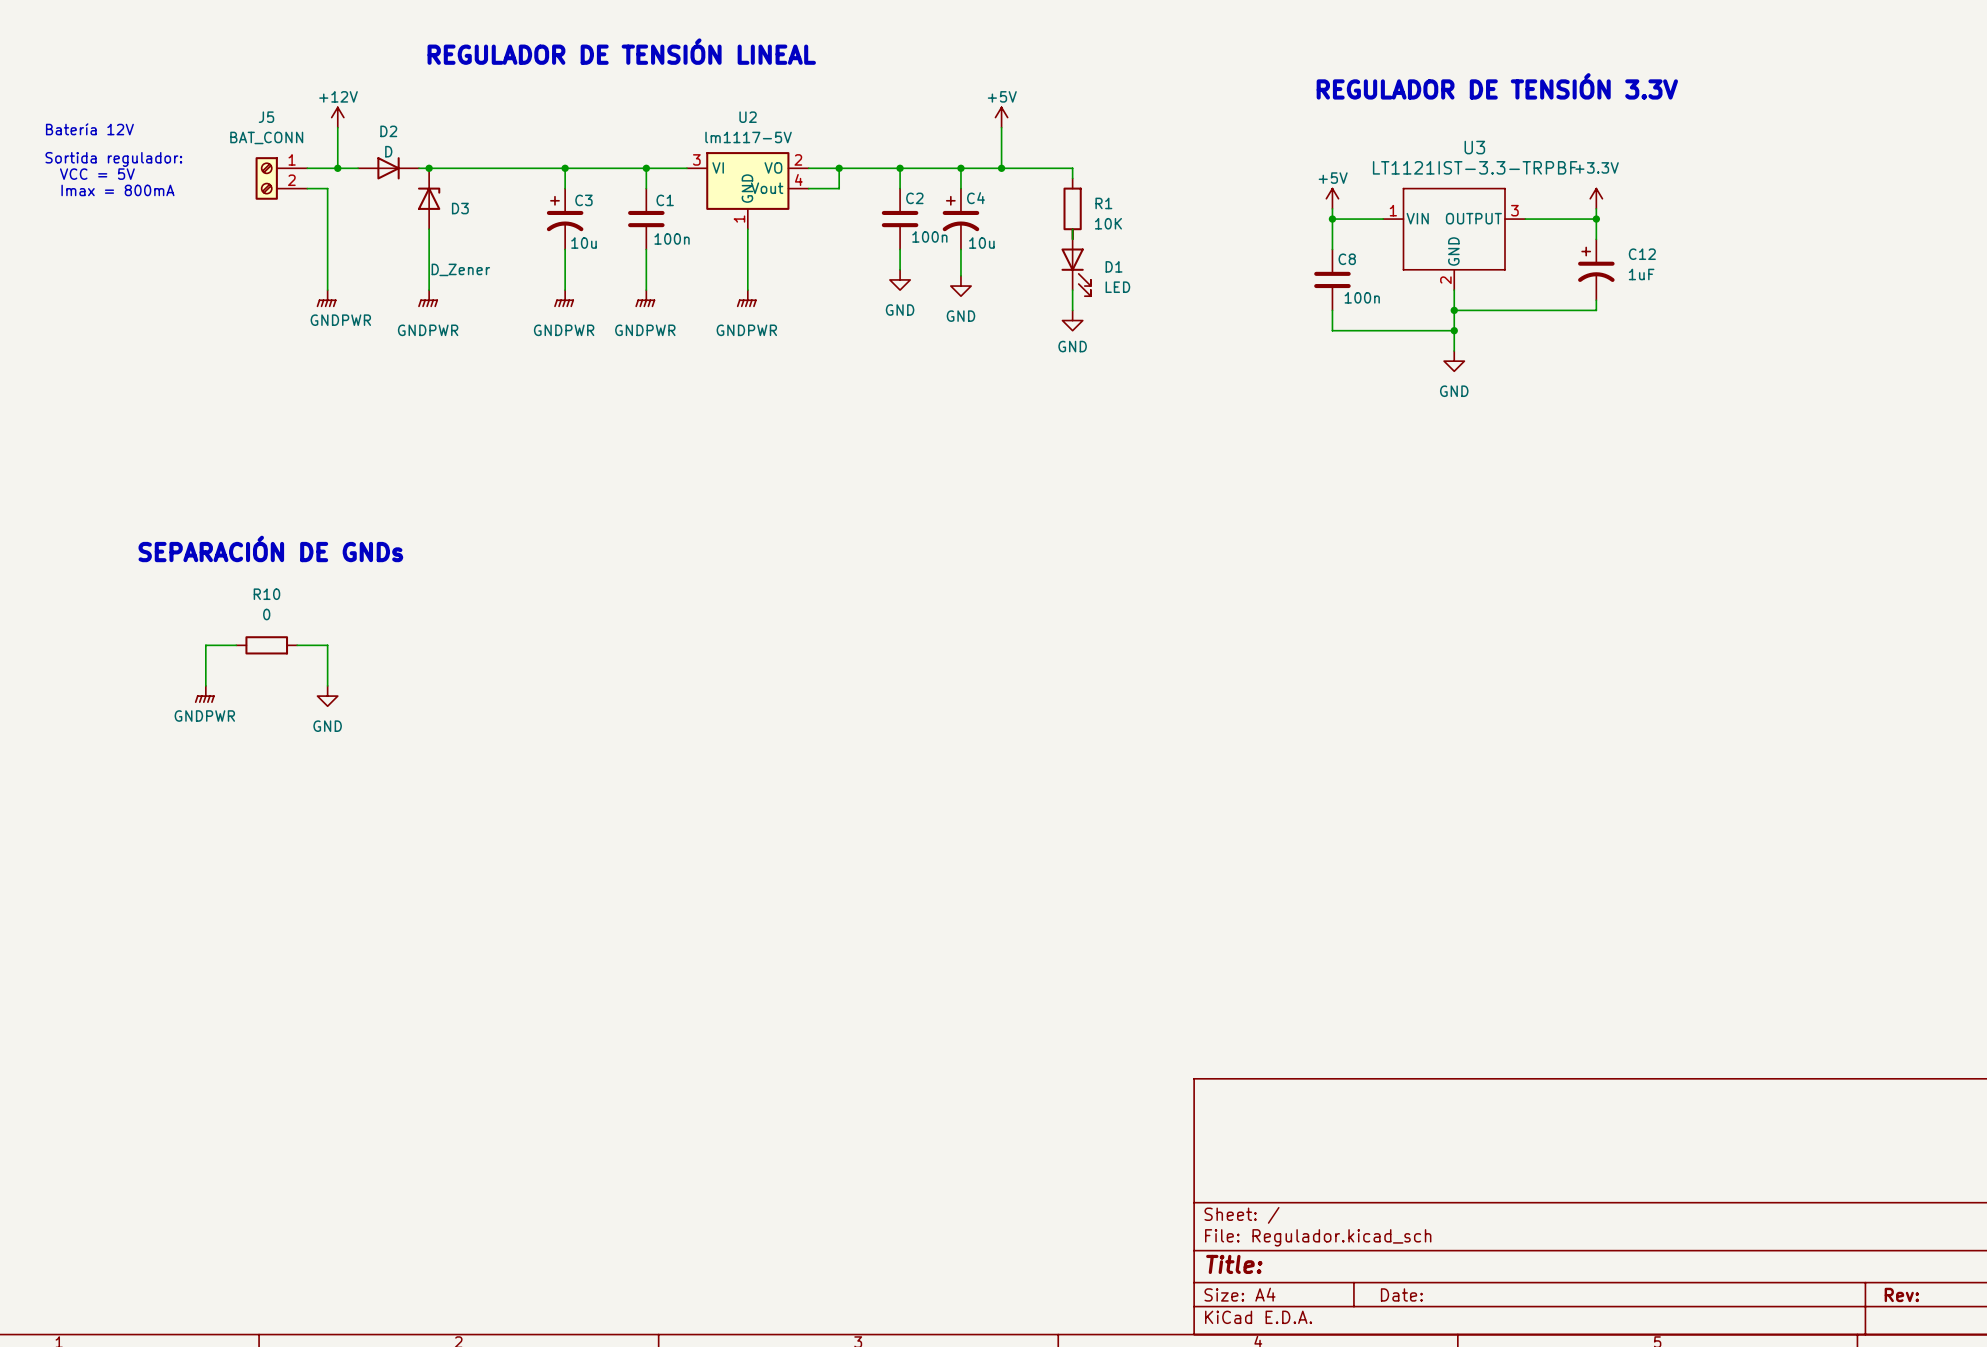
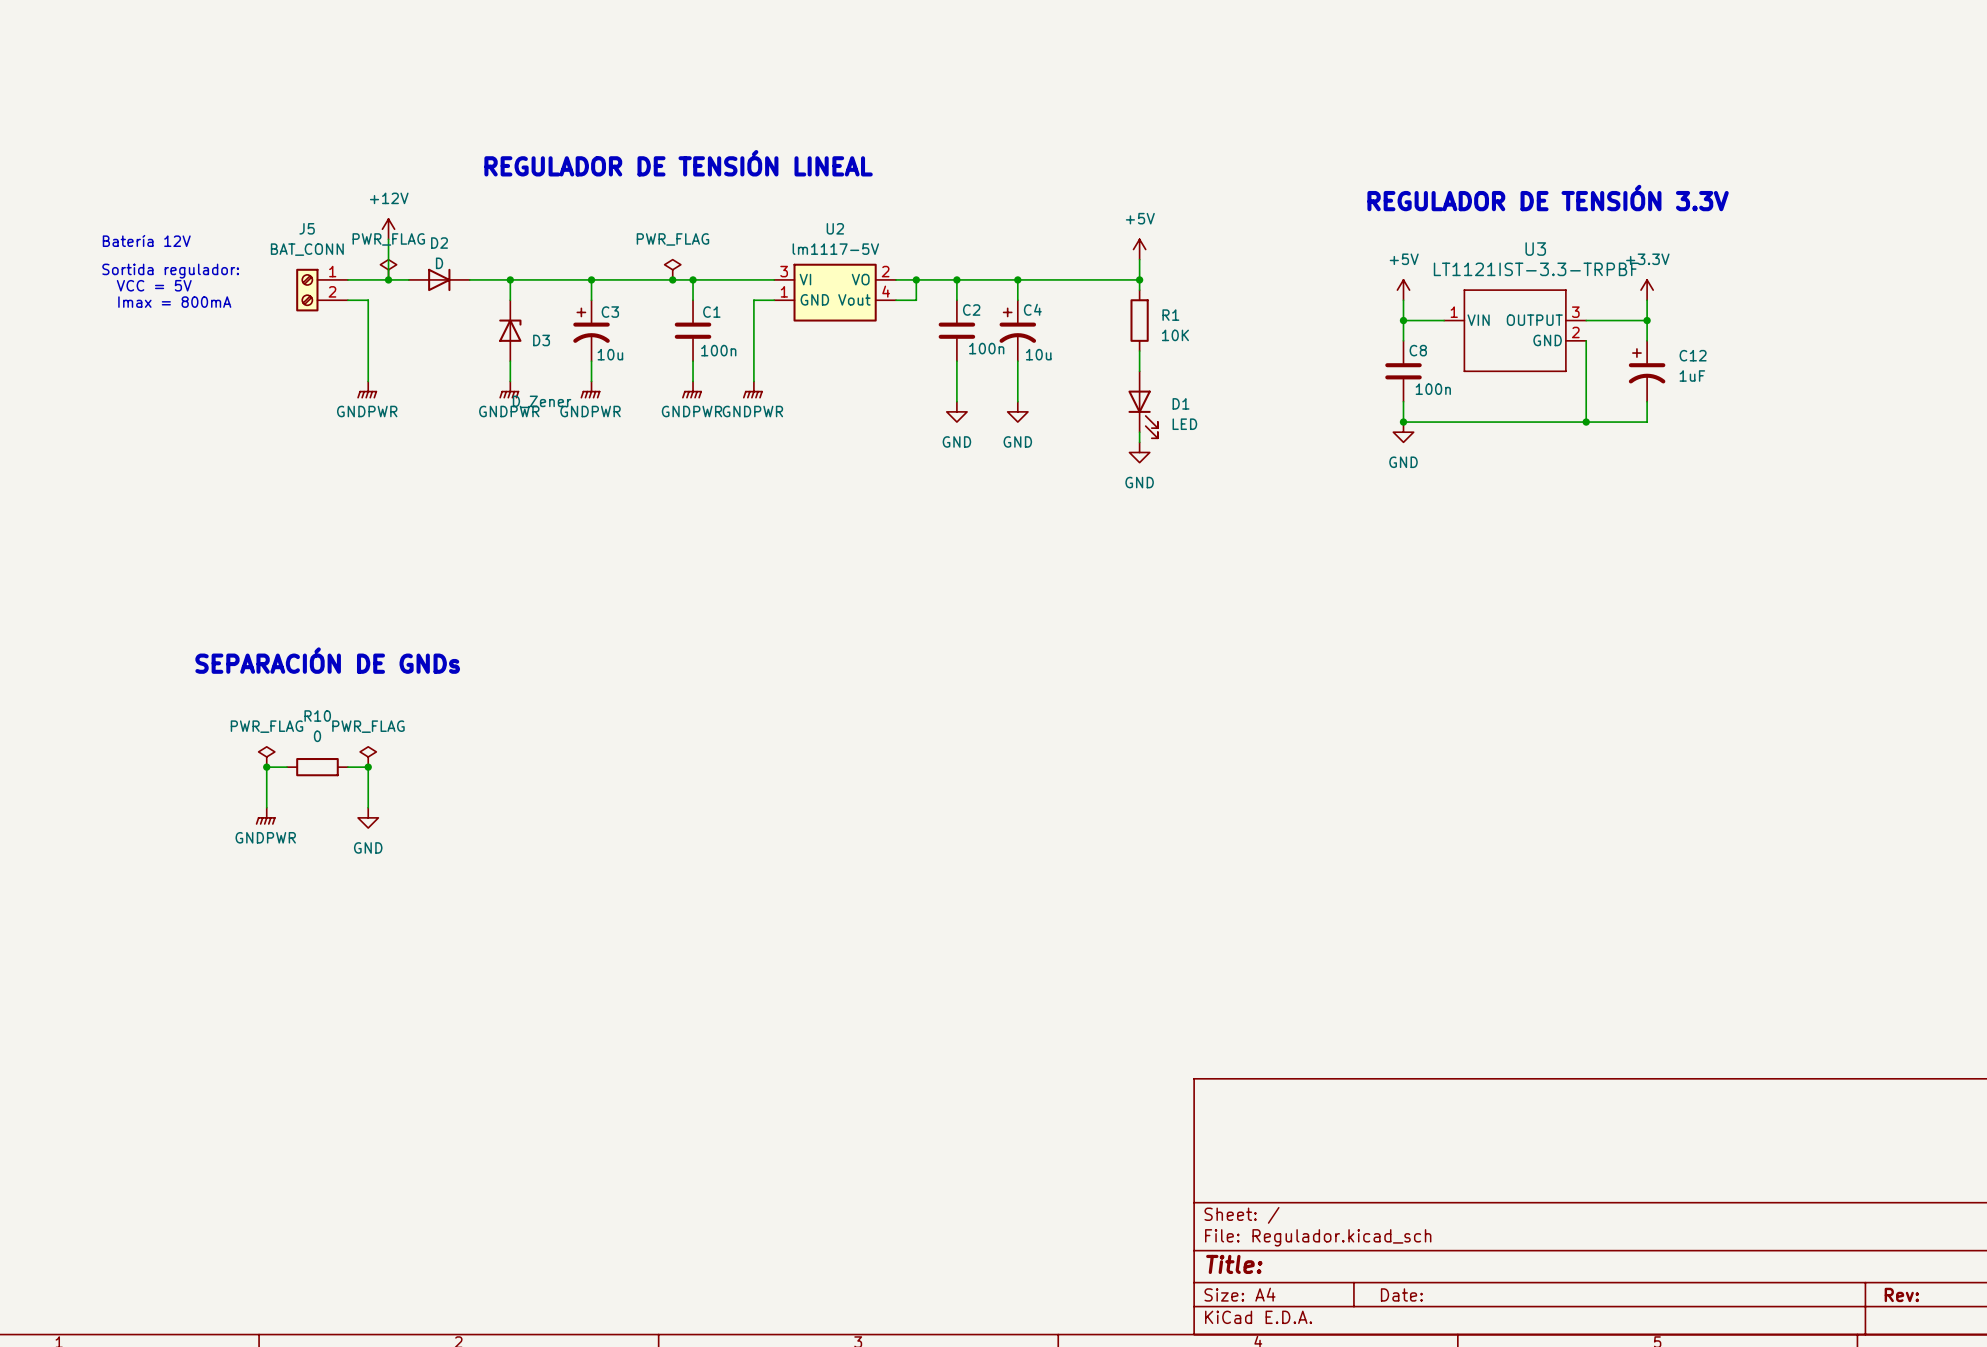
text position: REGULADOR DE TENSIÓN LINEAL (621, 51) -> REGULADOR DE TENSIÓN LINEAL (678, 163)
text position: REGULADOR DE TENSIÓN 3.3V (1497, 86) -> REGULADOR DE TENSIÓN 3.3V (1548, 198)
power symbol text position: +12V (338, 96) -> +12V (389, 198)
power symbol position: +12V (337, 117) -> +12V (388, 229)
power symbol: +5V (1001, 117) -> none
wire: (337, 127) (337, 168) -> (388, 239) (388, 279)
wire: (1001, 127) (1001, 168) -> none
text position: Batería 12V (89, 129) -> Batería 12V (146, 240)
U2 symbol: [686, 152, 809, 230] -> [774, 263, 897, 322]
text position: Sortida regulador: (113, 159) -> Sortida regulador: (170, 271)
wire: (307, 168) (358, 168) -> none
junction: (337, 168) -> none
D2 position: (388, 168) -> (439, 279)
wire: (418, 168) (686, 168) -> none
junction: (429, 168) -> none
wire: (565, 168) (565, 188) -> (510, 279) (510, 300)
junction: (565, 168) -> none
wire: (646, 168) (646, 188) -> (591, 279) (591, 300)
junction: (646, 168) -> none
wire: (808, 168) (1072, 168) (1072, 178) -> none
wire: (839, 168) (839, 188) (808, 188) -> none
junction: (839, 168) -> none
wire: (900, 168) (900, 188) -> (956, 279) (956, 300)
junction: (900, 168) -> none
wire: (960, 168) (960, 188) -> (1017, 279) (1017, 300)
junction: (960, 168) -> none
junction: (1001, 168) -> none
text position: VCC = 5V (97, 174) -> VCC = 5V (154, 285)
J5 position: (281, 178) -> (322, 290)
wire: (307, 188) (327, 188) (327, 290) -> none
U3 symbol: [1383, 188, 1526, 291] -> [1444, 289, 1587, 372]
text position: Imax = 800mA (117, 190) -> Imax = 800mA (174, 302)
D3 position: (429, 198) -> (510, 330)
power symbol: +5V (1332, 198) -> none
power symbol position: +3.3V (1596, 198) -> +3.3V (1647, 290)
R1 position: (1072, 208) -> (1139, 320)
wire: (1332, 208) (1332, 249) -> (1403, 300) (1403, 340)
wire: (1596, 208) (1596, 239) -> none
C3 position: (565, 219) -> (591, 330)
C1 position: (646, 219) -> (693, 330)
C2 position: (900, 219) -> (956, 330)
C4 position: (960, 219) -> (1017, 330)
wire: (1332, 219) (1383, 219) -> none
junction: (1332, 219) -> none
wire: (1525, 219) (1596, 219) -> none
junction: (1596, 219) -> none
wire: (429, 229) (429, 290) -> none
wire: (747, 229) (747, 290) -> none
wire: (1072, 229) (1072, 239) -> none
wire: (565, 249) (565, 290) -> none
wire: (646, 249) (646, 290) -> none
wire: (900, 249) (900, 269) -> none
wire: (960, 249) (960, 275) -> none
power symbol: none -> +5V (1139, 249)
wire: none -> (1139, 259) (1139, 290)
D1 position: (1076, 262) -> (1143, 404)
D1 name position: D1 (1114, 266) -> D1 (1181, 403)
power symbol: none -> PWR_FLAG (388, 269)
power symbol: none -> PWR_FLAG (672, 269)
C12 position: (1596, 269) -> (1647, 371)
wire: none -> (347, 279) (408, 279)
junction: none -> (388, 279)
wire: none -> (469, 279) (774, 279)
junction: none -> (510, 279)
junction: none -> (591, 279)
junction: none -> (672, 279)
wire: none -> (693, 279) (693, 300)
junction: none -> (693, 279)
wire: none -> (896, 279) (1139, 279)
power symbol: GND (900, 279) -> none
wire: none -> (916, 279) (916, 300) (896, 300)
junction: none -> (916, 279)
junction: none -> (956, 279)
junction: none -> (1017, 279)
junction: none -> (1139, 279)
C8 position: (1332, 279) -> (1403, 371)
power symbol: GND (960, 286) -> none
D1 value position: LED (1117, 287) -> LED (1184, 424)
wire: (1072, 290) (1072, 310) -> (1139, 351) (1139, 371)
power symbol: none -> +5V (1403, 290)
wire: (1454, 290) (1454, 351) -> none
power symbol: GNDPWR (326, 298) -> none
power symbol: GNDPWR (428, 298) -> none
power symbol: GNDPWR (564, 298) -> none
power symbol: GNDPWR (645, 298) -> none
power symbol: GNDPWR (746, 298) -> none
wire: none -> (347, 300) (368, 300) (368, 381)
wire: none -> (774, 300) (753, 300) (753, 381)
wire: (1596, 300) (1596, 310) (1454, 310) -> none
wire: none -> (1647, 300) (1647, 340)
wire: (1332, 310) (1332, 330) (1454, 330) -> none
junction: (1454, 310) -> none
power symbol: GND (1072, 320) -> none
wire: none -> (1403, 320) (1444, 320)
junction: none -> (1403, 320)
wire: none -> (1586, 320) (1647, 320)
junction: none -> (1647, 320)
junction: (1454, 330) -> none
wire: none -> (1586, 340) (1586, 422)
wire: none -> (510, 361) (510, 381)
wire: none -> (591, 361) (591, 381)
wire: none -> (693, 361) (693, 381)
wire: none -> (956, 361) (956, 401)
wire: none -> (1017, 361) (1017, 401)
power symbol position: GND (1454, 361) -> GND (1403, 432)
power symbol: none -> GNDPWR (367, 389)
power symbol: none -> GNDPWR (509, 389)
power symbol: none -> GNDPWR (590, 389)
power symbol: none -> GNDPWR (692, 389)
power symbol: none -> GNDPWR (752, 389)
wire: none -> (1403, 401) (1403, 422) (1647, 422) (1647, 401)
power symbol: none -> GND (956, 411)
power symbol: none -> GND (1017, 411)
junction: none -> (1403, 422)
junction: none -> (1586, 422)
wire: none -> (1139, 432) (1139, 442)
power symbol: none -> GND (1139, 452)
text position: SEPARACIÓN DE GNDs (270, 548) -> SEPARACIÓN DE GNDs (327, 660)
wire: (236, 645) (205, 645) (205, 685) -> none
R10 position: (266, 645) -> (317, 767)
wire: (297, 645) (327, 645) (327, 685) -> none
power symbol position: GNDPWR (204, 694) -> GNDPWR (265, 816)
power symbol position: GND (327, 696) -> GND (368, 817)
power symbol: none -> PWR_FLAG (266, 756)
power symbol: none -> PWR_FLAG (368, 756)
junction: none -> (266, 767)
wire: none -> (287, 767) (266, 767) (266, 807)
wire: none -> (347, 767) (368, 767) (368, 807)
junction: none -> (368, 767)

